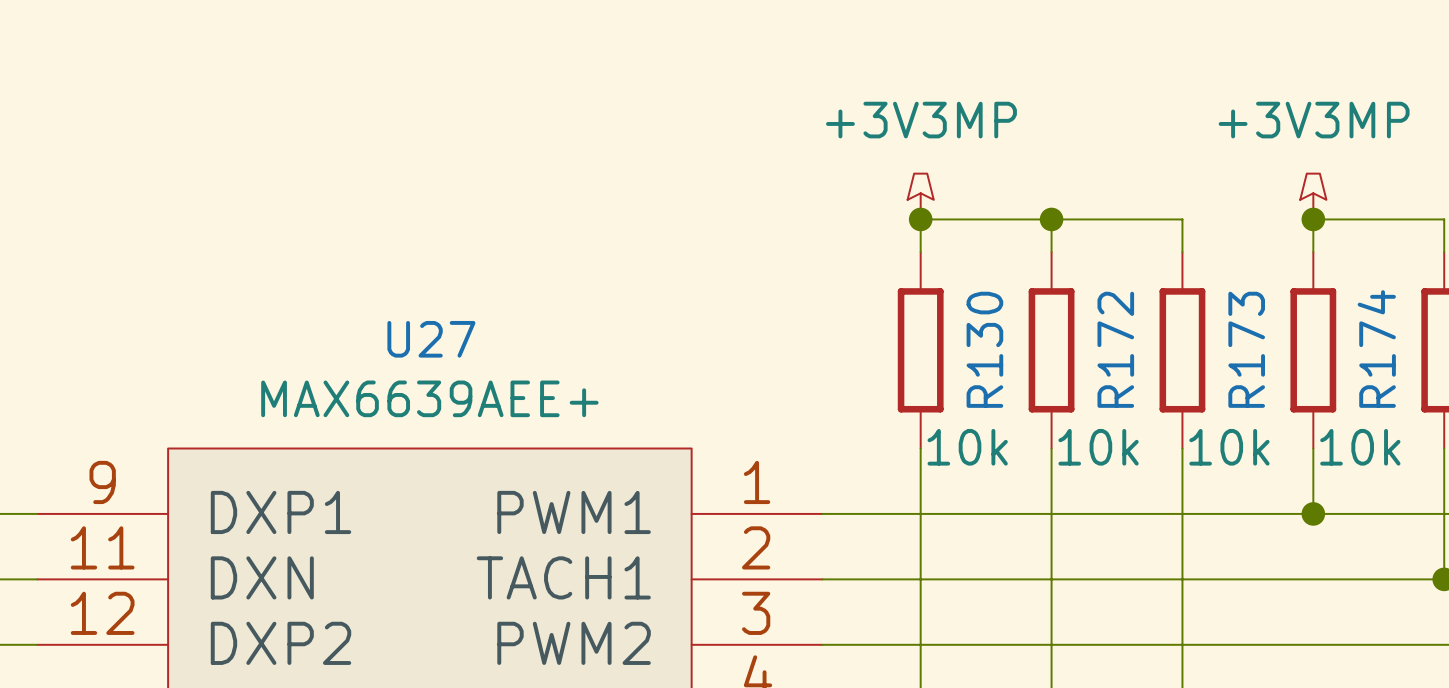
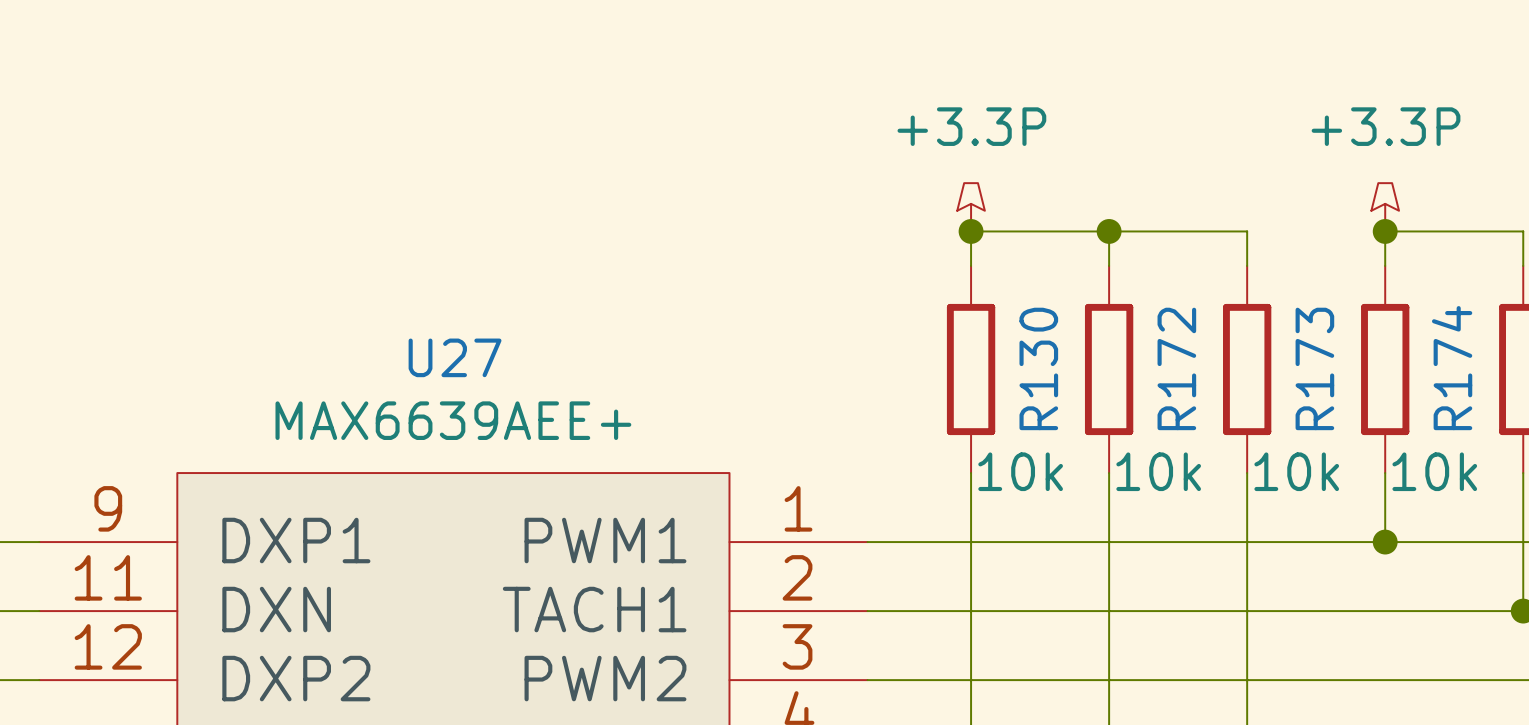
power symbol: +3V3MP (920, 196) -> +3.3P (971, 207)
power symbol: +3V3MP (1313, 196) -> +3.3P (1385, 207)

